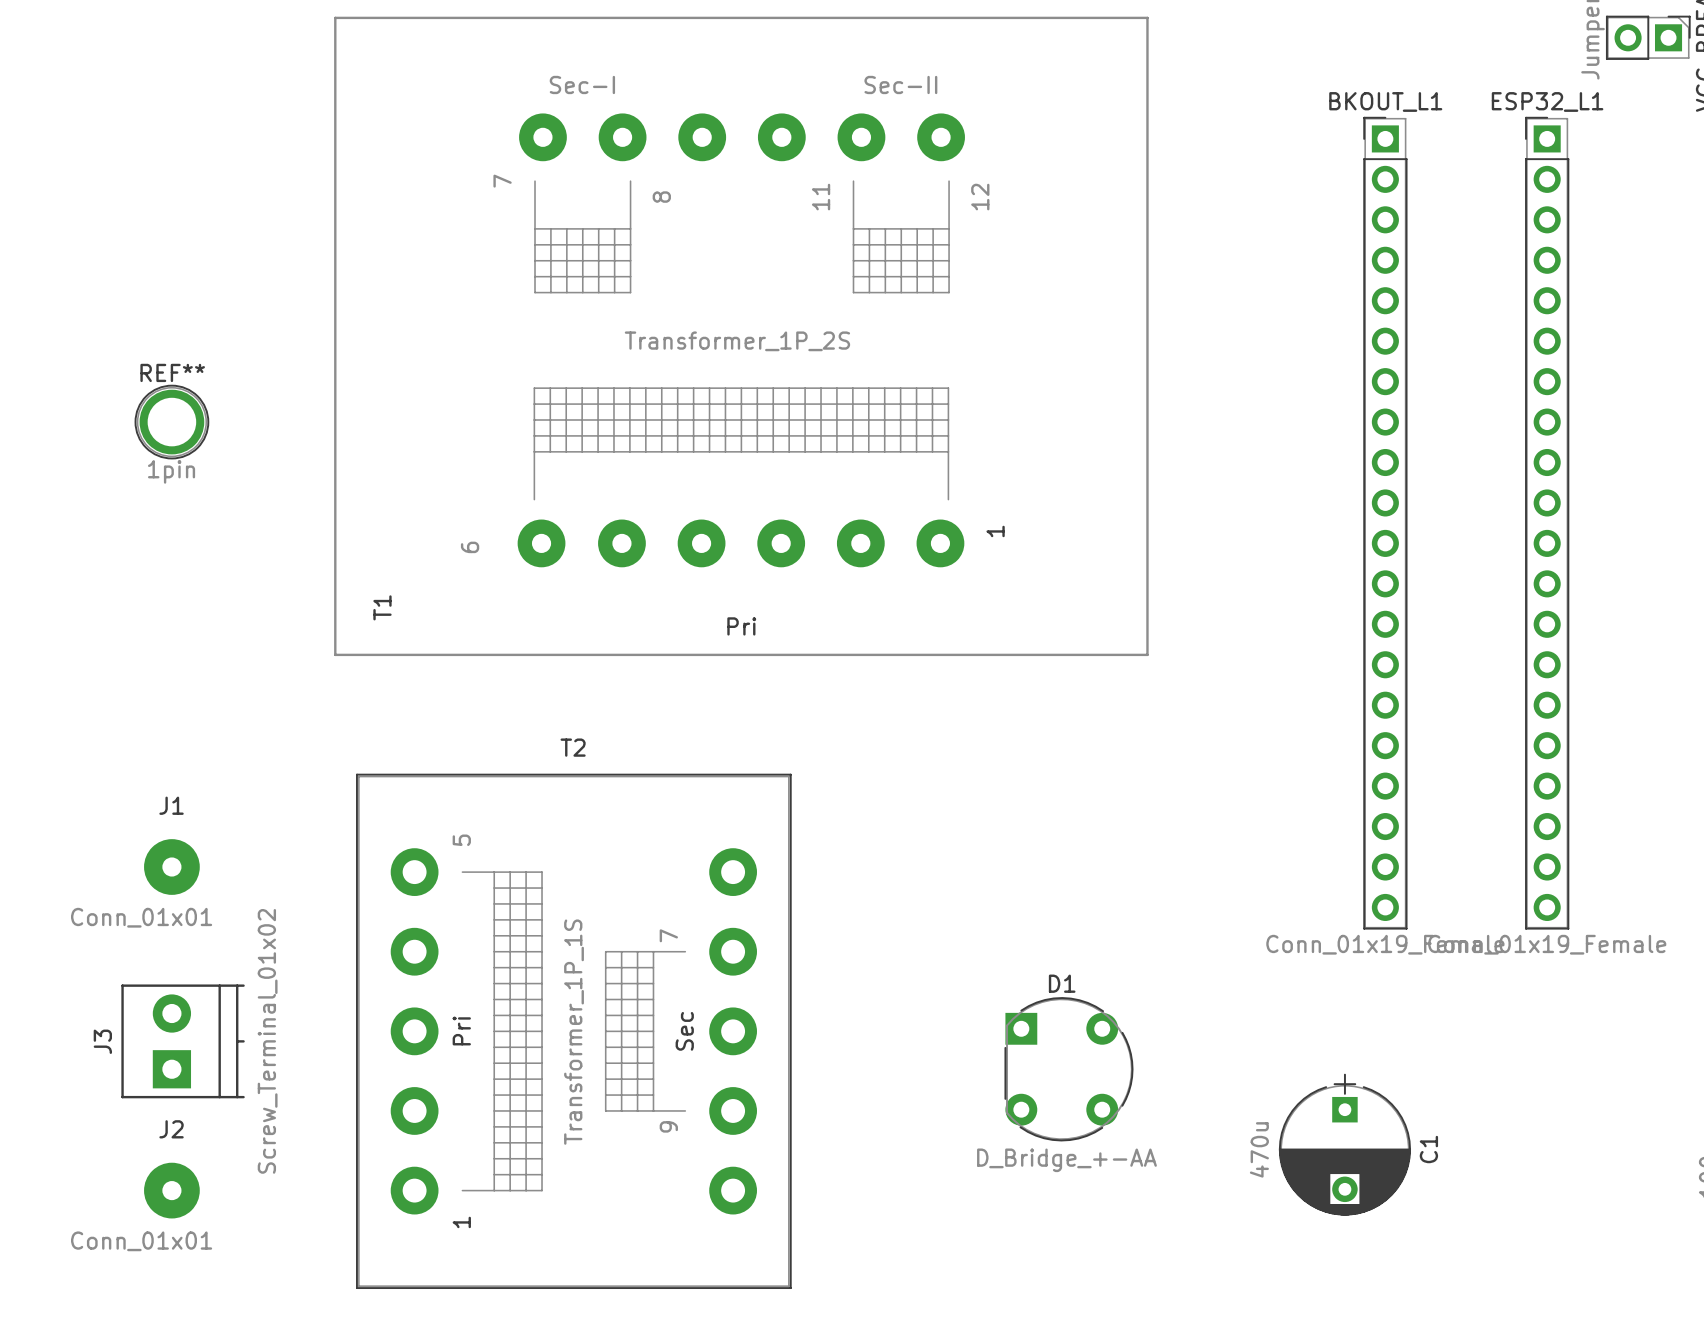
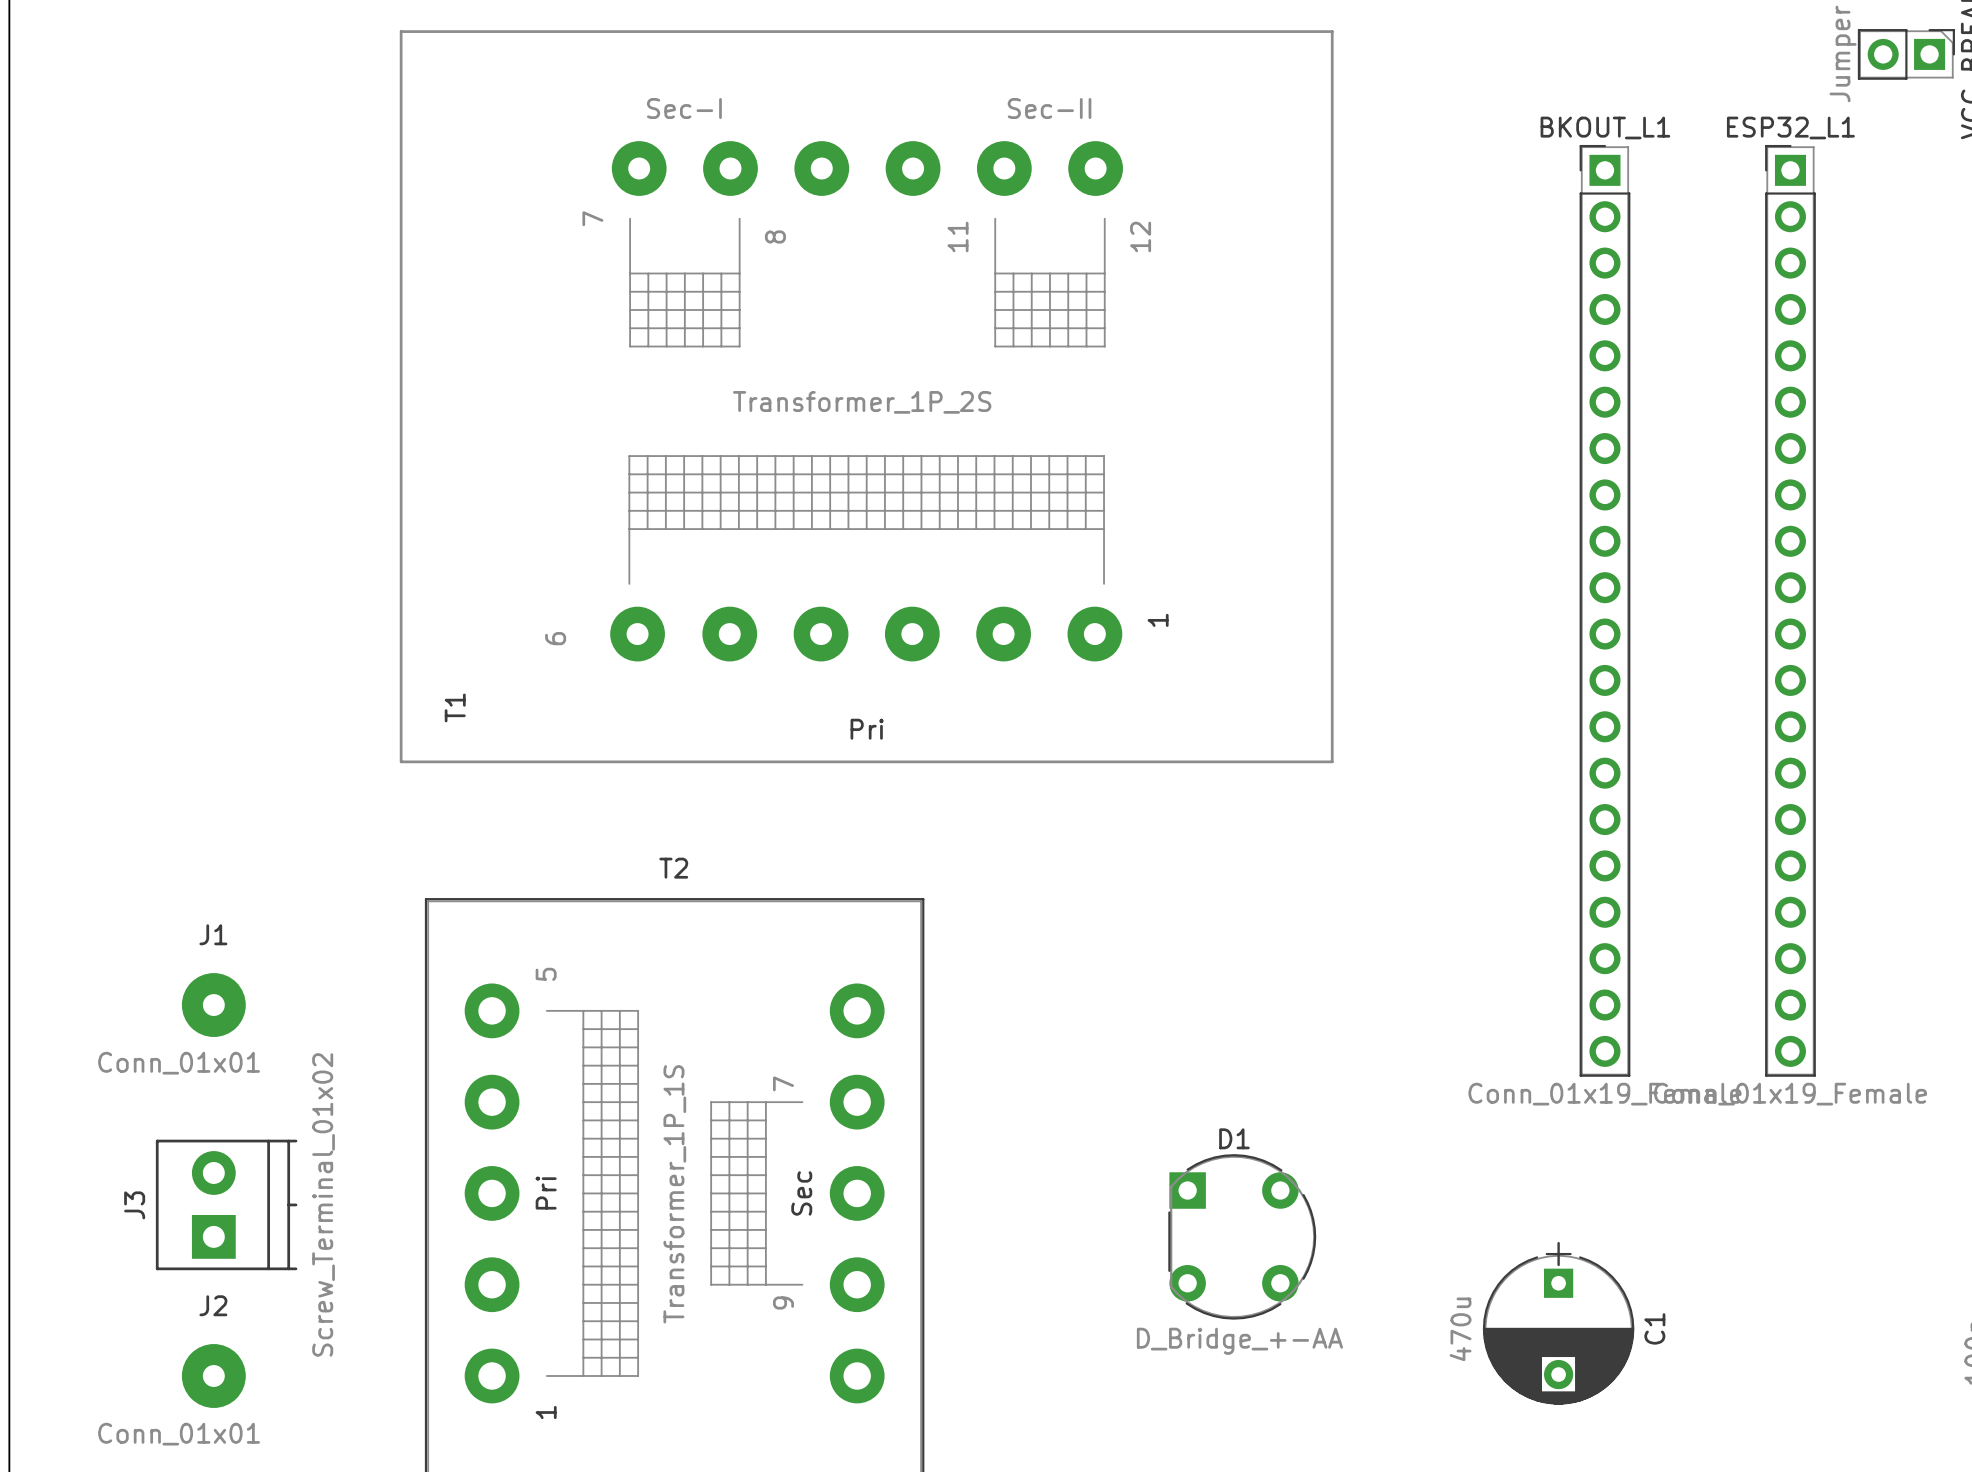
REF**: 1pin (171, 422) -> none

